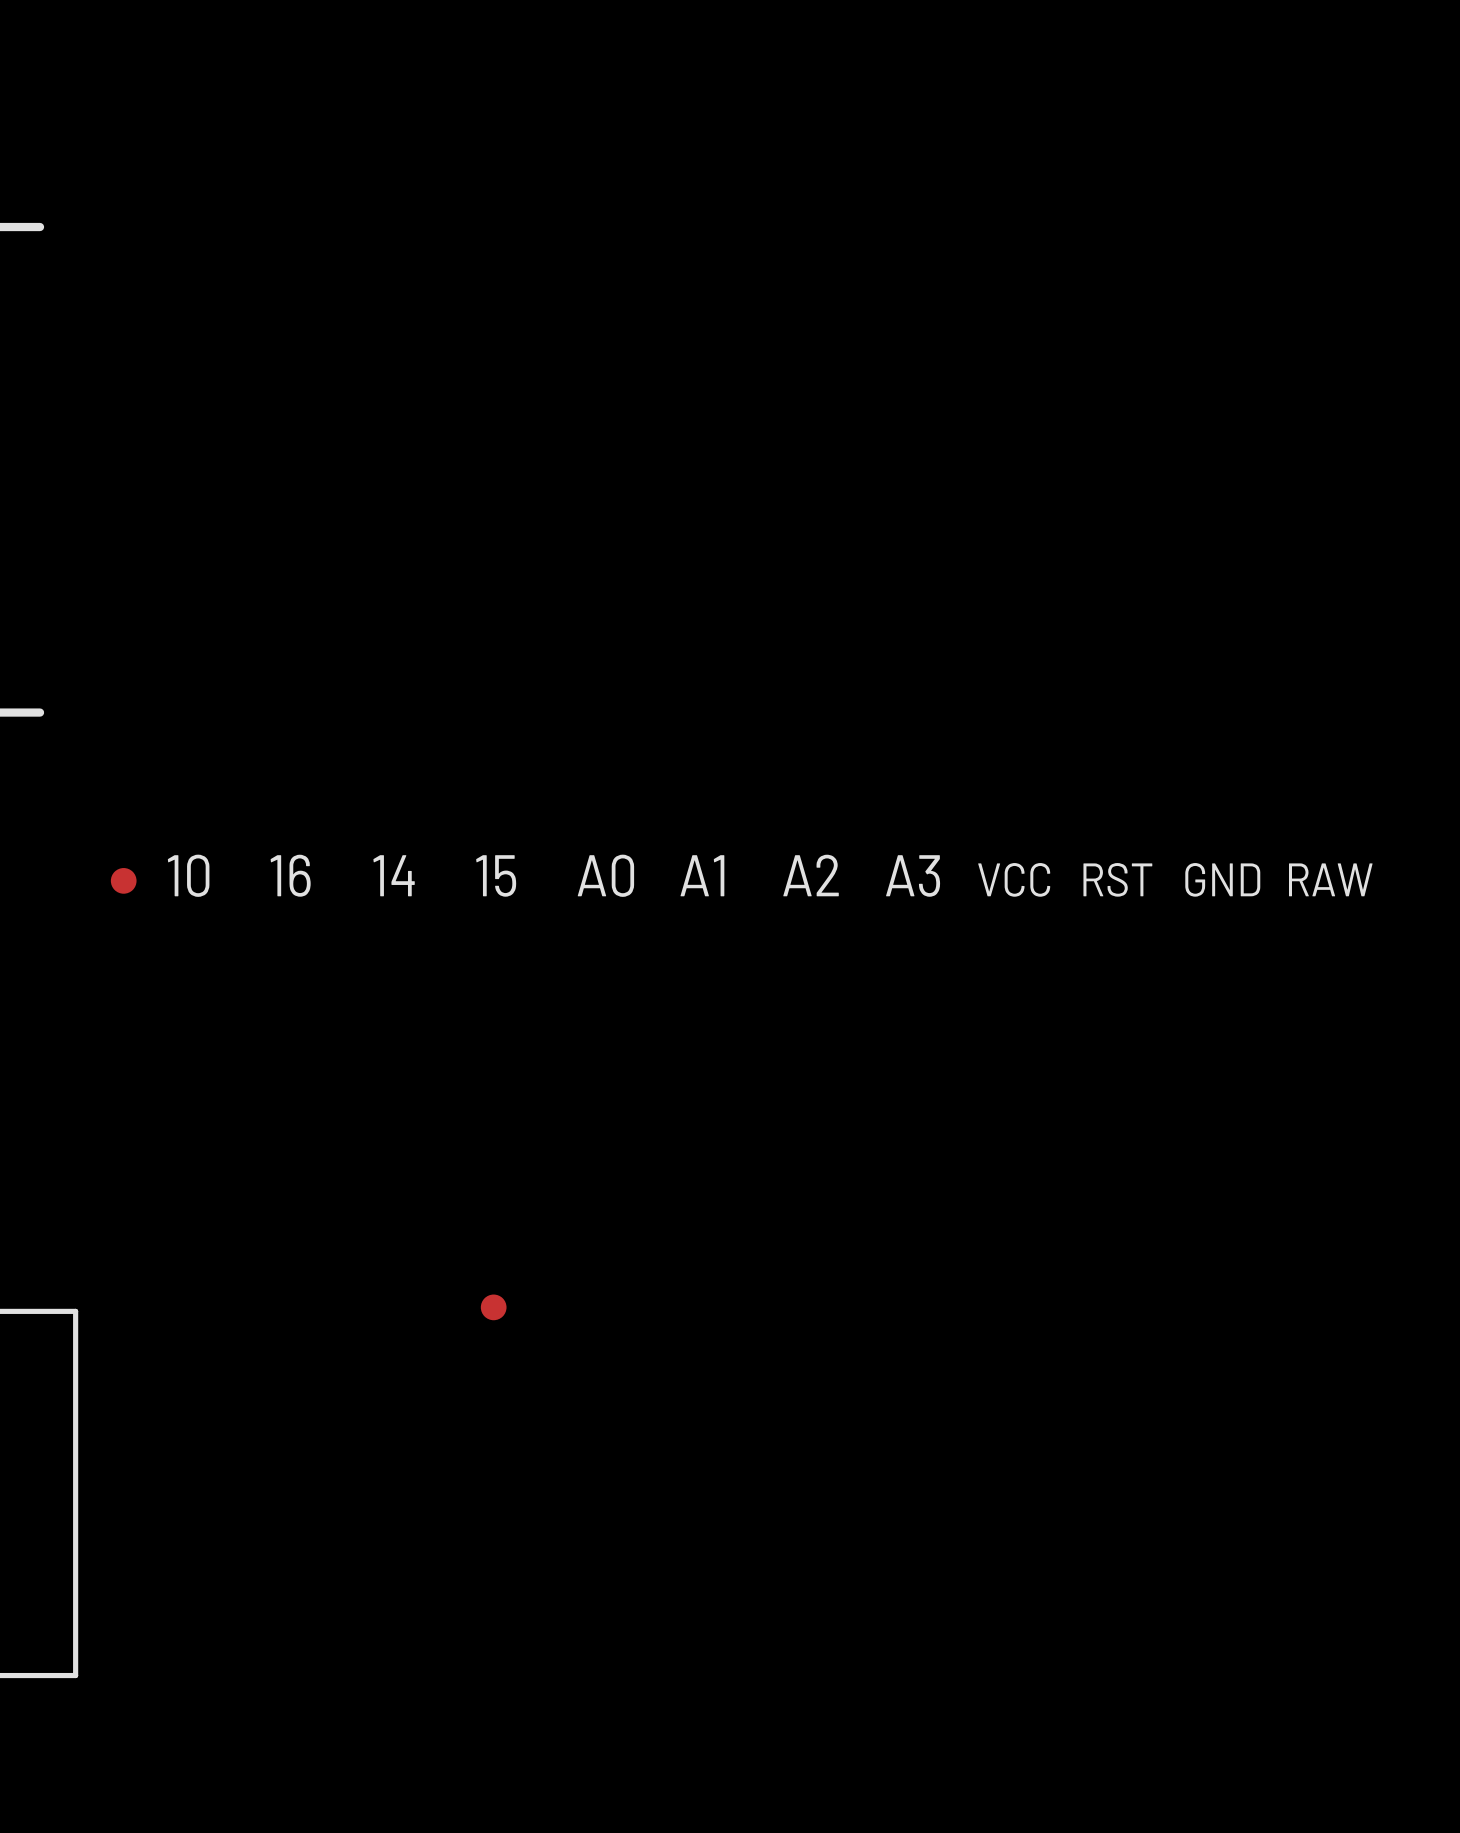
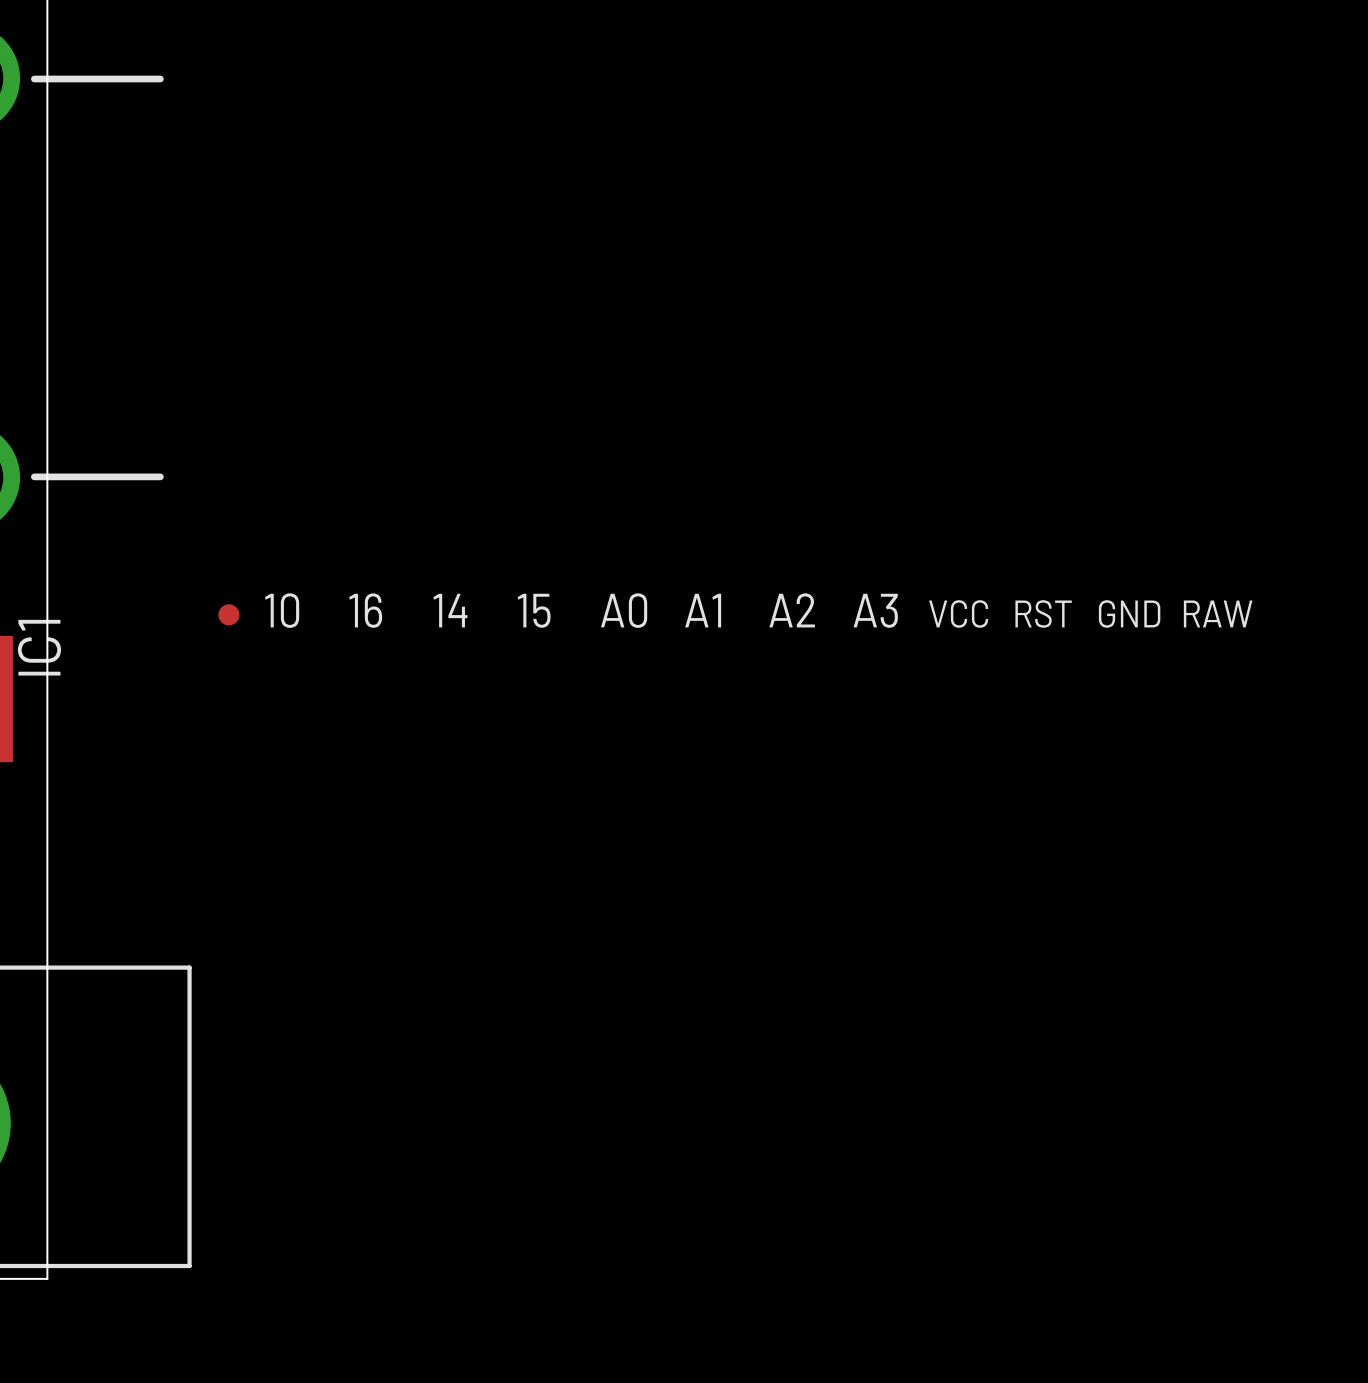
part: (493, 1307) -> none

